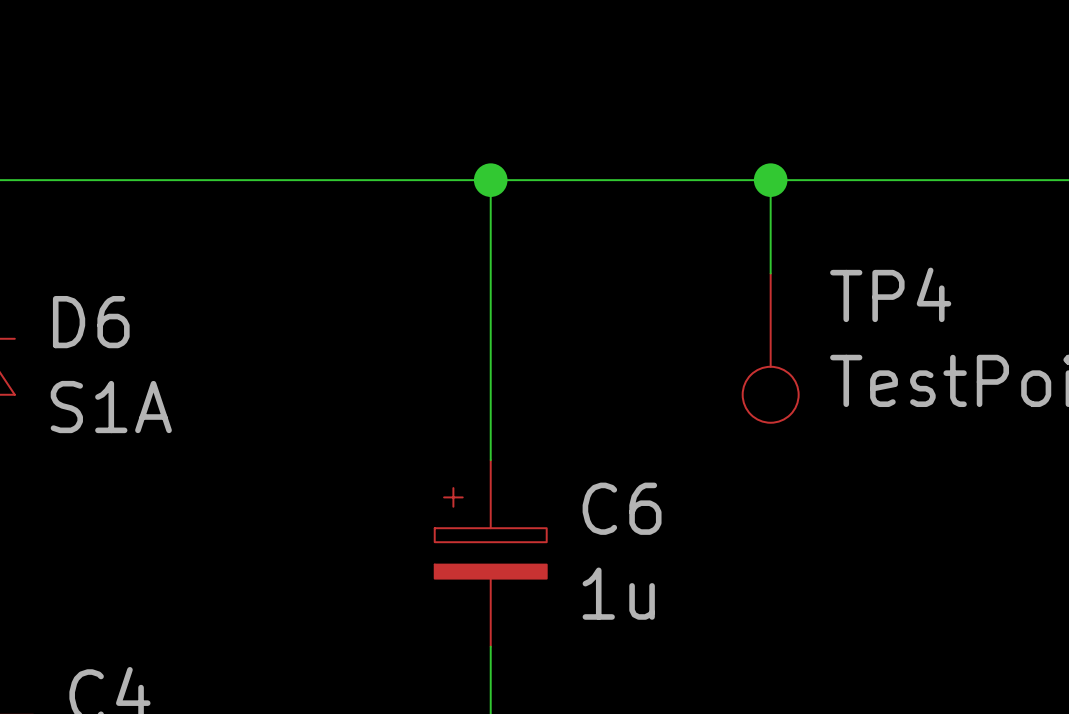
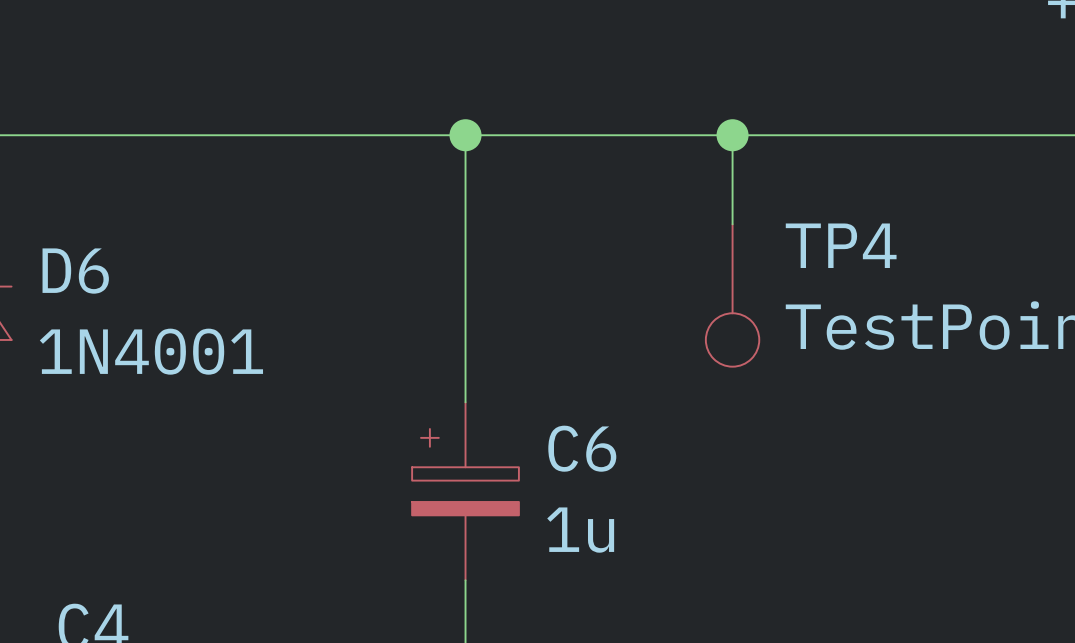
D6 value: S1A (111, 407) -> 1N4001 (151, 351)

